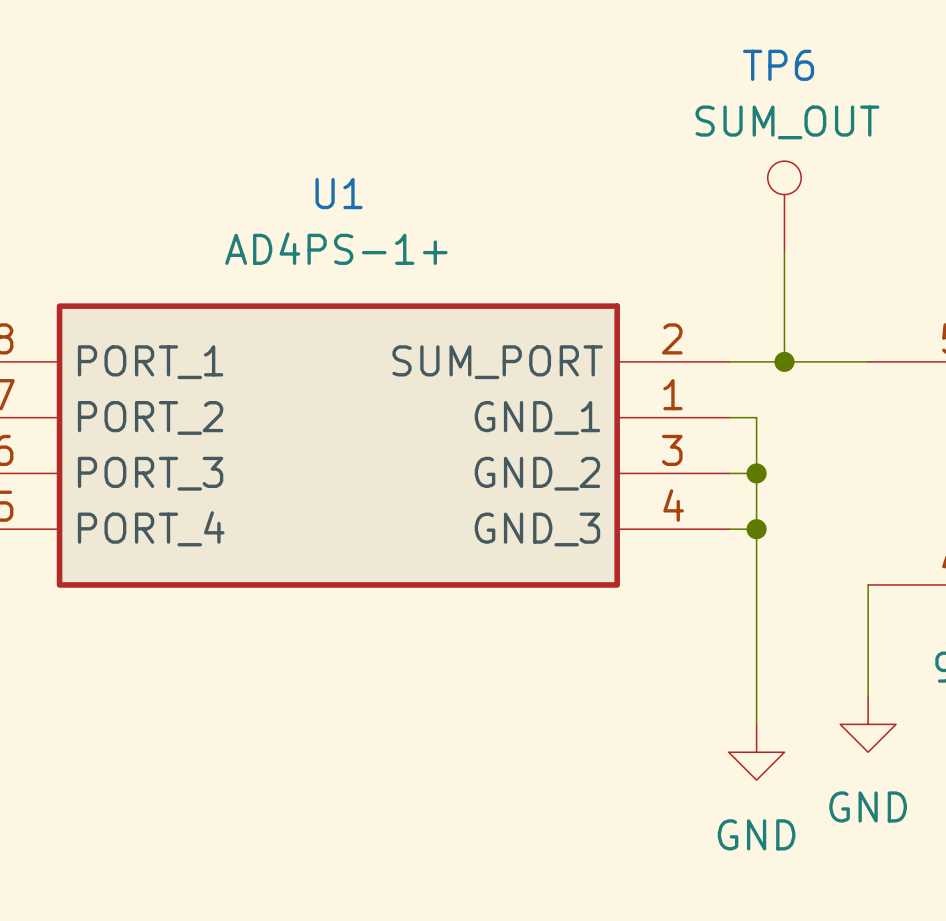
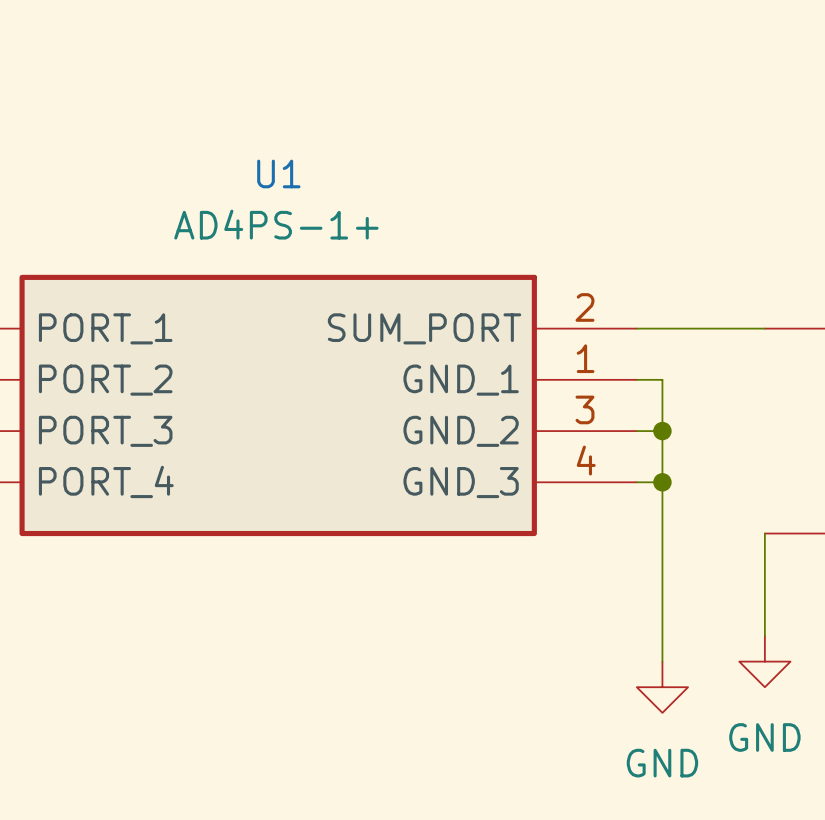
TP6: SUM_OUT (784, 205) -> none
wire: (784, 250) (784, 361) -> none
junction: (784, 361) -> none

